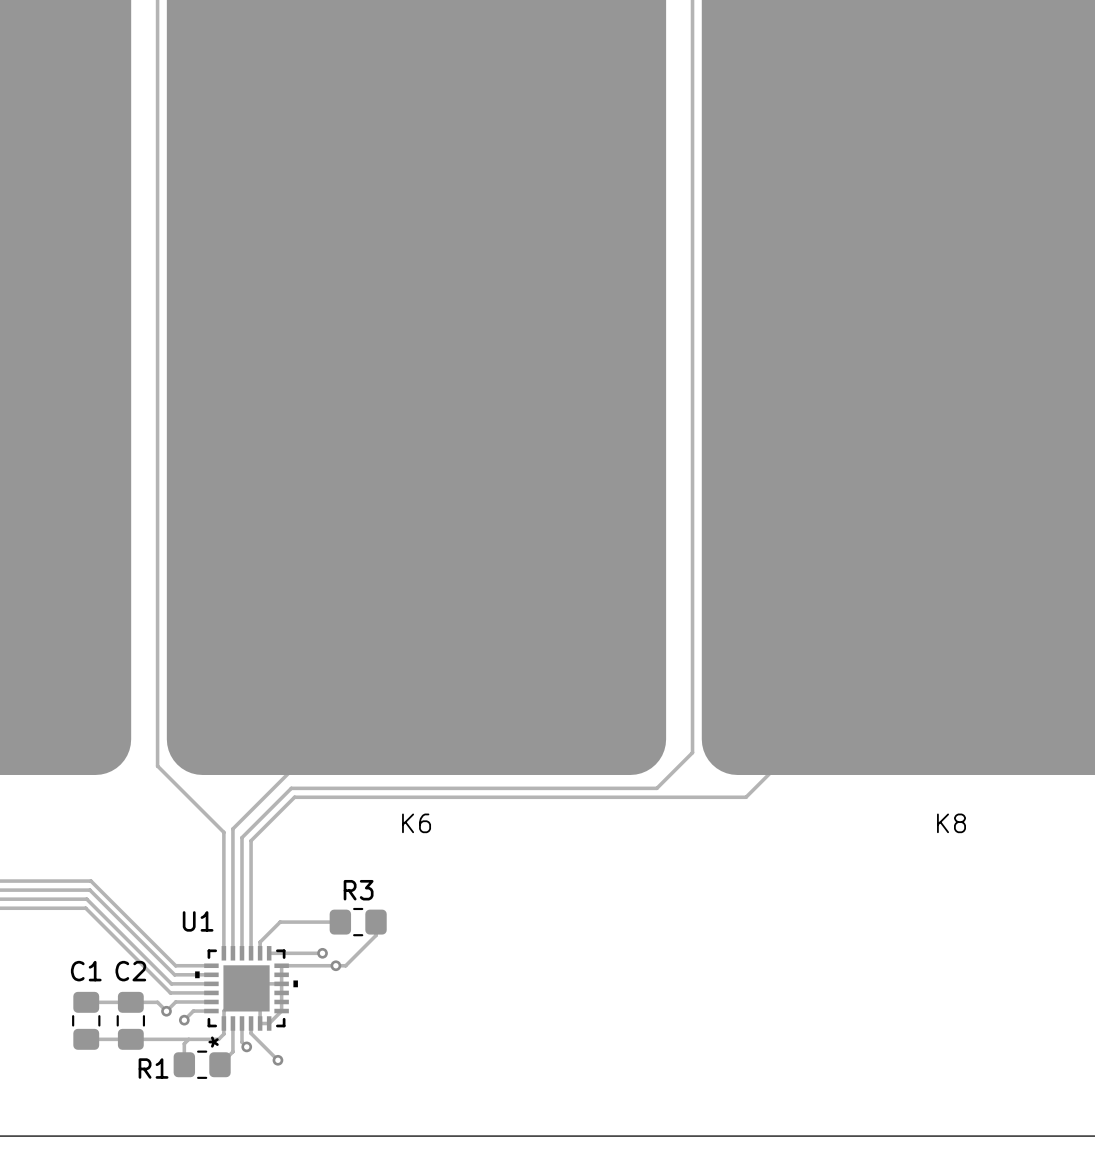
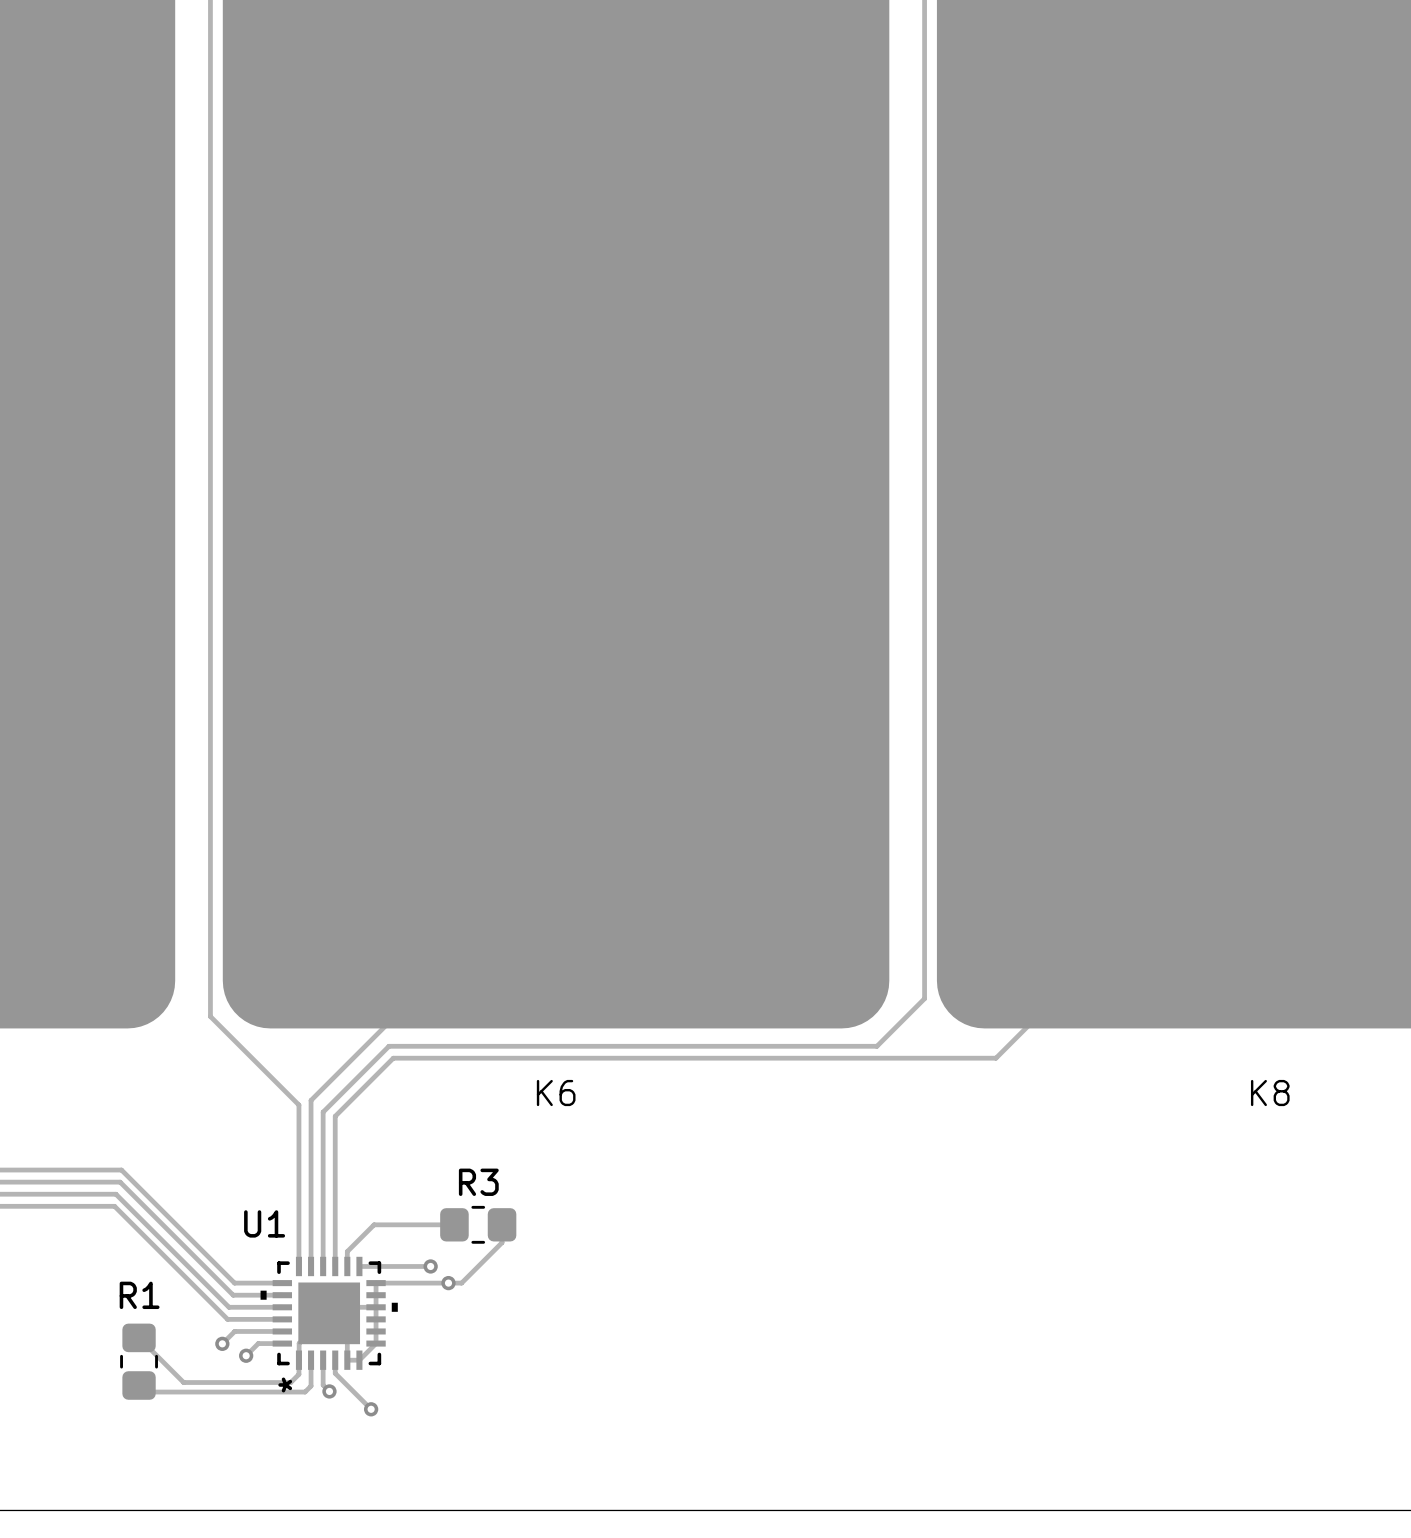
track: (86, 1002) (157, 1002) (166, 1011) -> none
C1: (86, 1020) -> none
C2: (130, 1020) -> none
track: (86, 1039) (218, 1039) -> (139, 1337) (183, 1382) (291, 1381)
track: (188, 1039) (184, 1043) (184, 1064) -> none
track: (232, 1042) (232, 1051) (219, 1064) -> (311, 1386) (305, 1392) (145, 1392) (139, 1385)
R1 rotation: 0° (202, 1064) -> 90° clockwise (139, 1361)
R1 position: (202, 1064) -> (139, 1361)

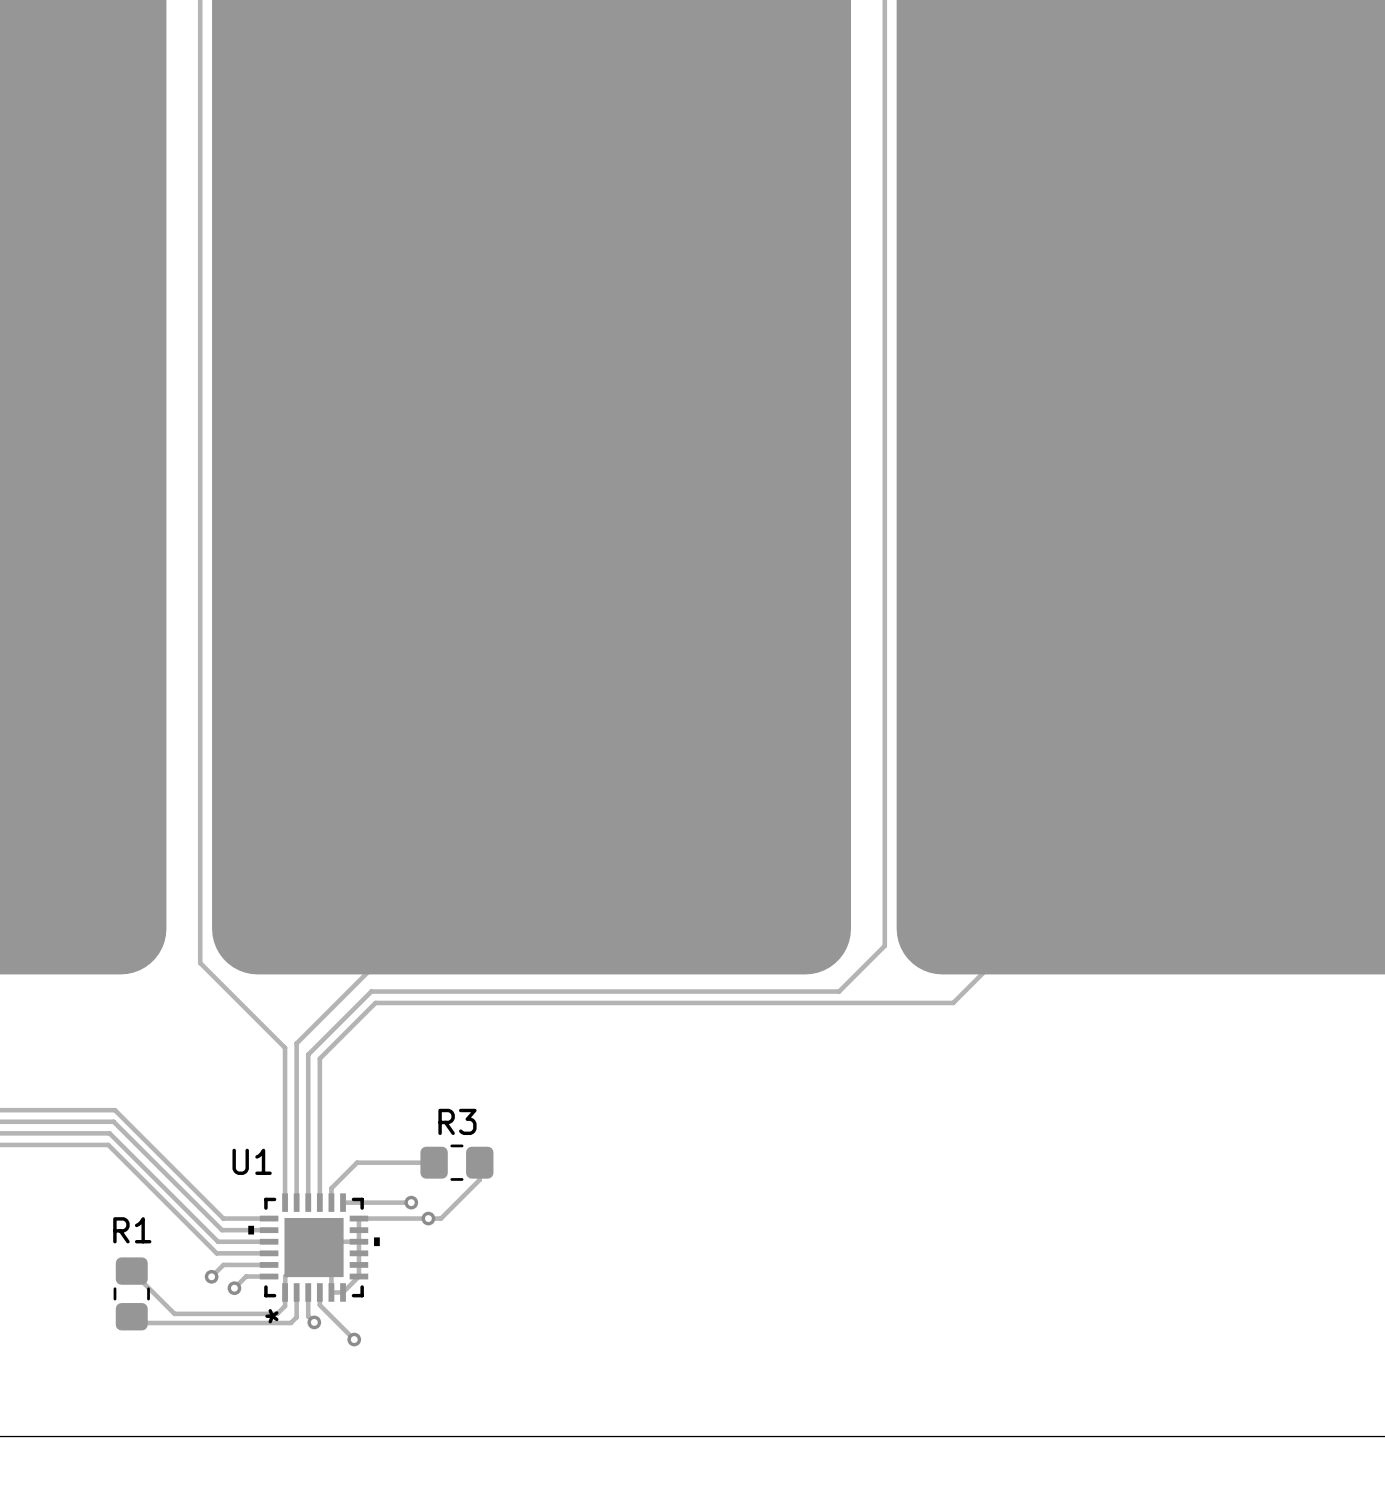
K6 name: K6 (556, 1093) -> none
K8 name: K8 (1270, 1093) -> none

